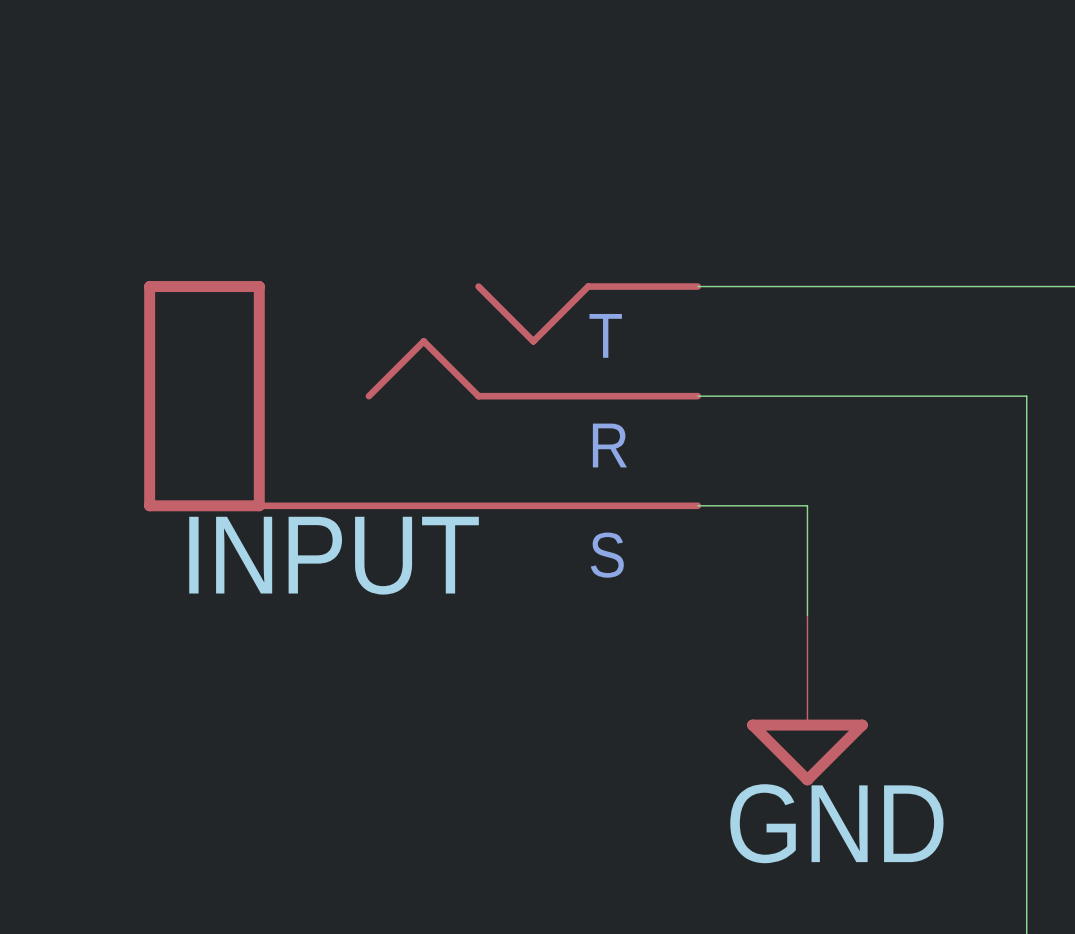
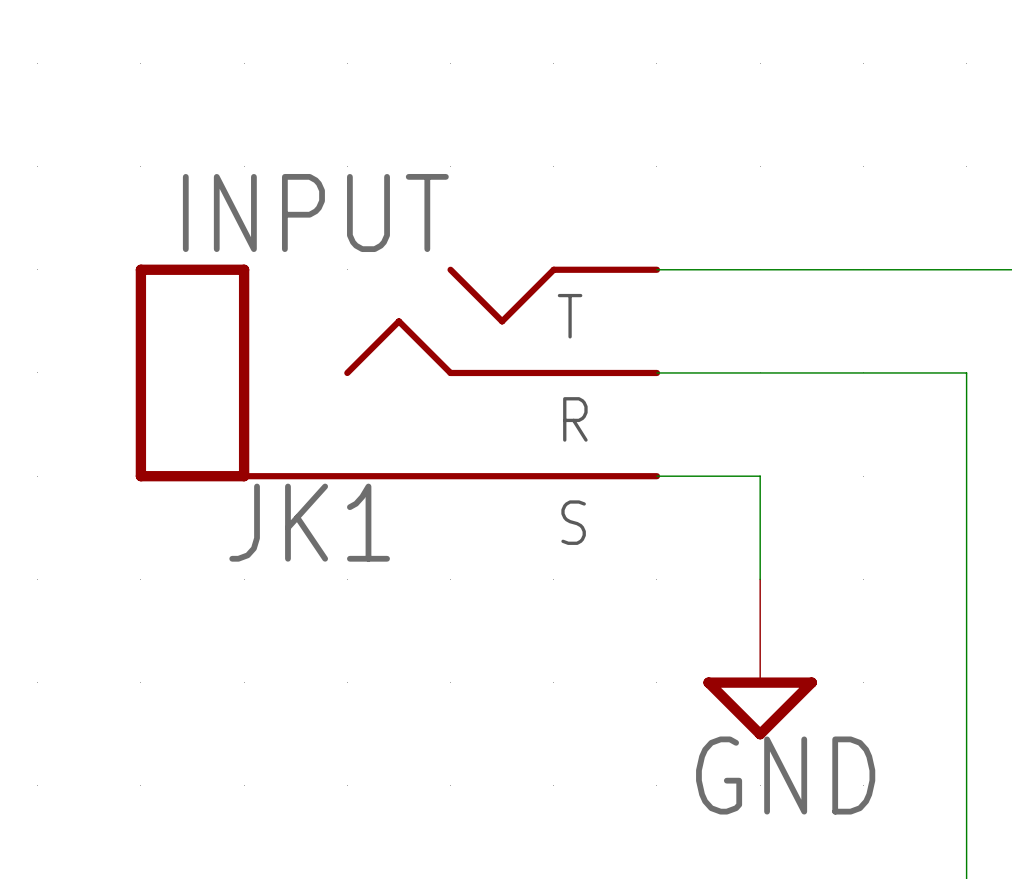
INPUT value: none -> INPUT (315, 213)
INPUT name: INPUT (334, 555) -> JK1 (309, 522)

